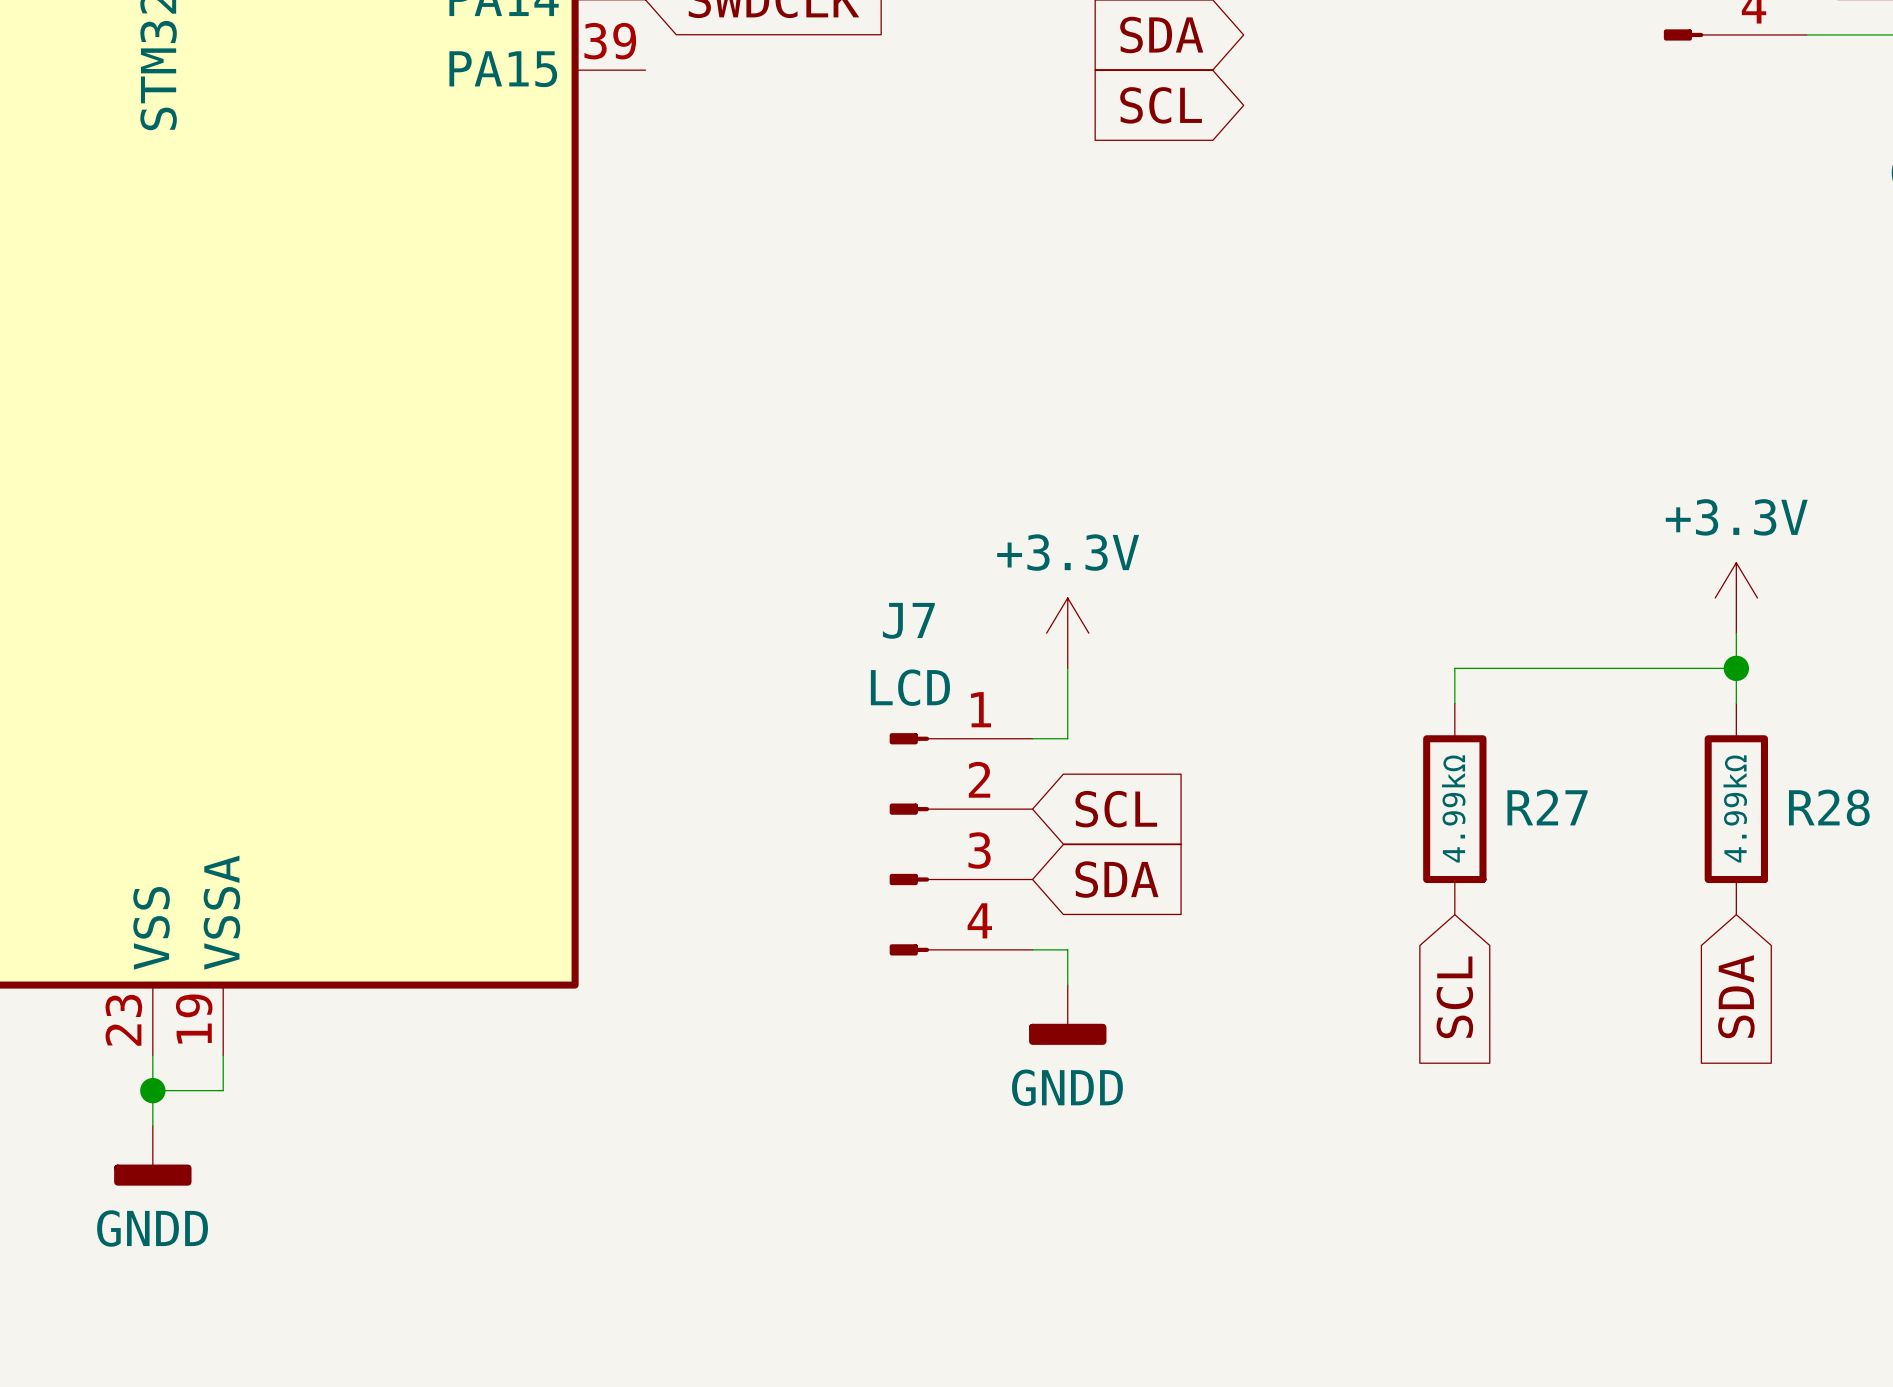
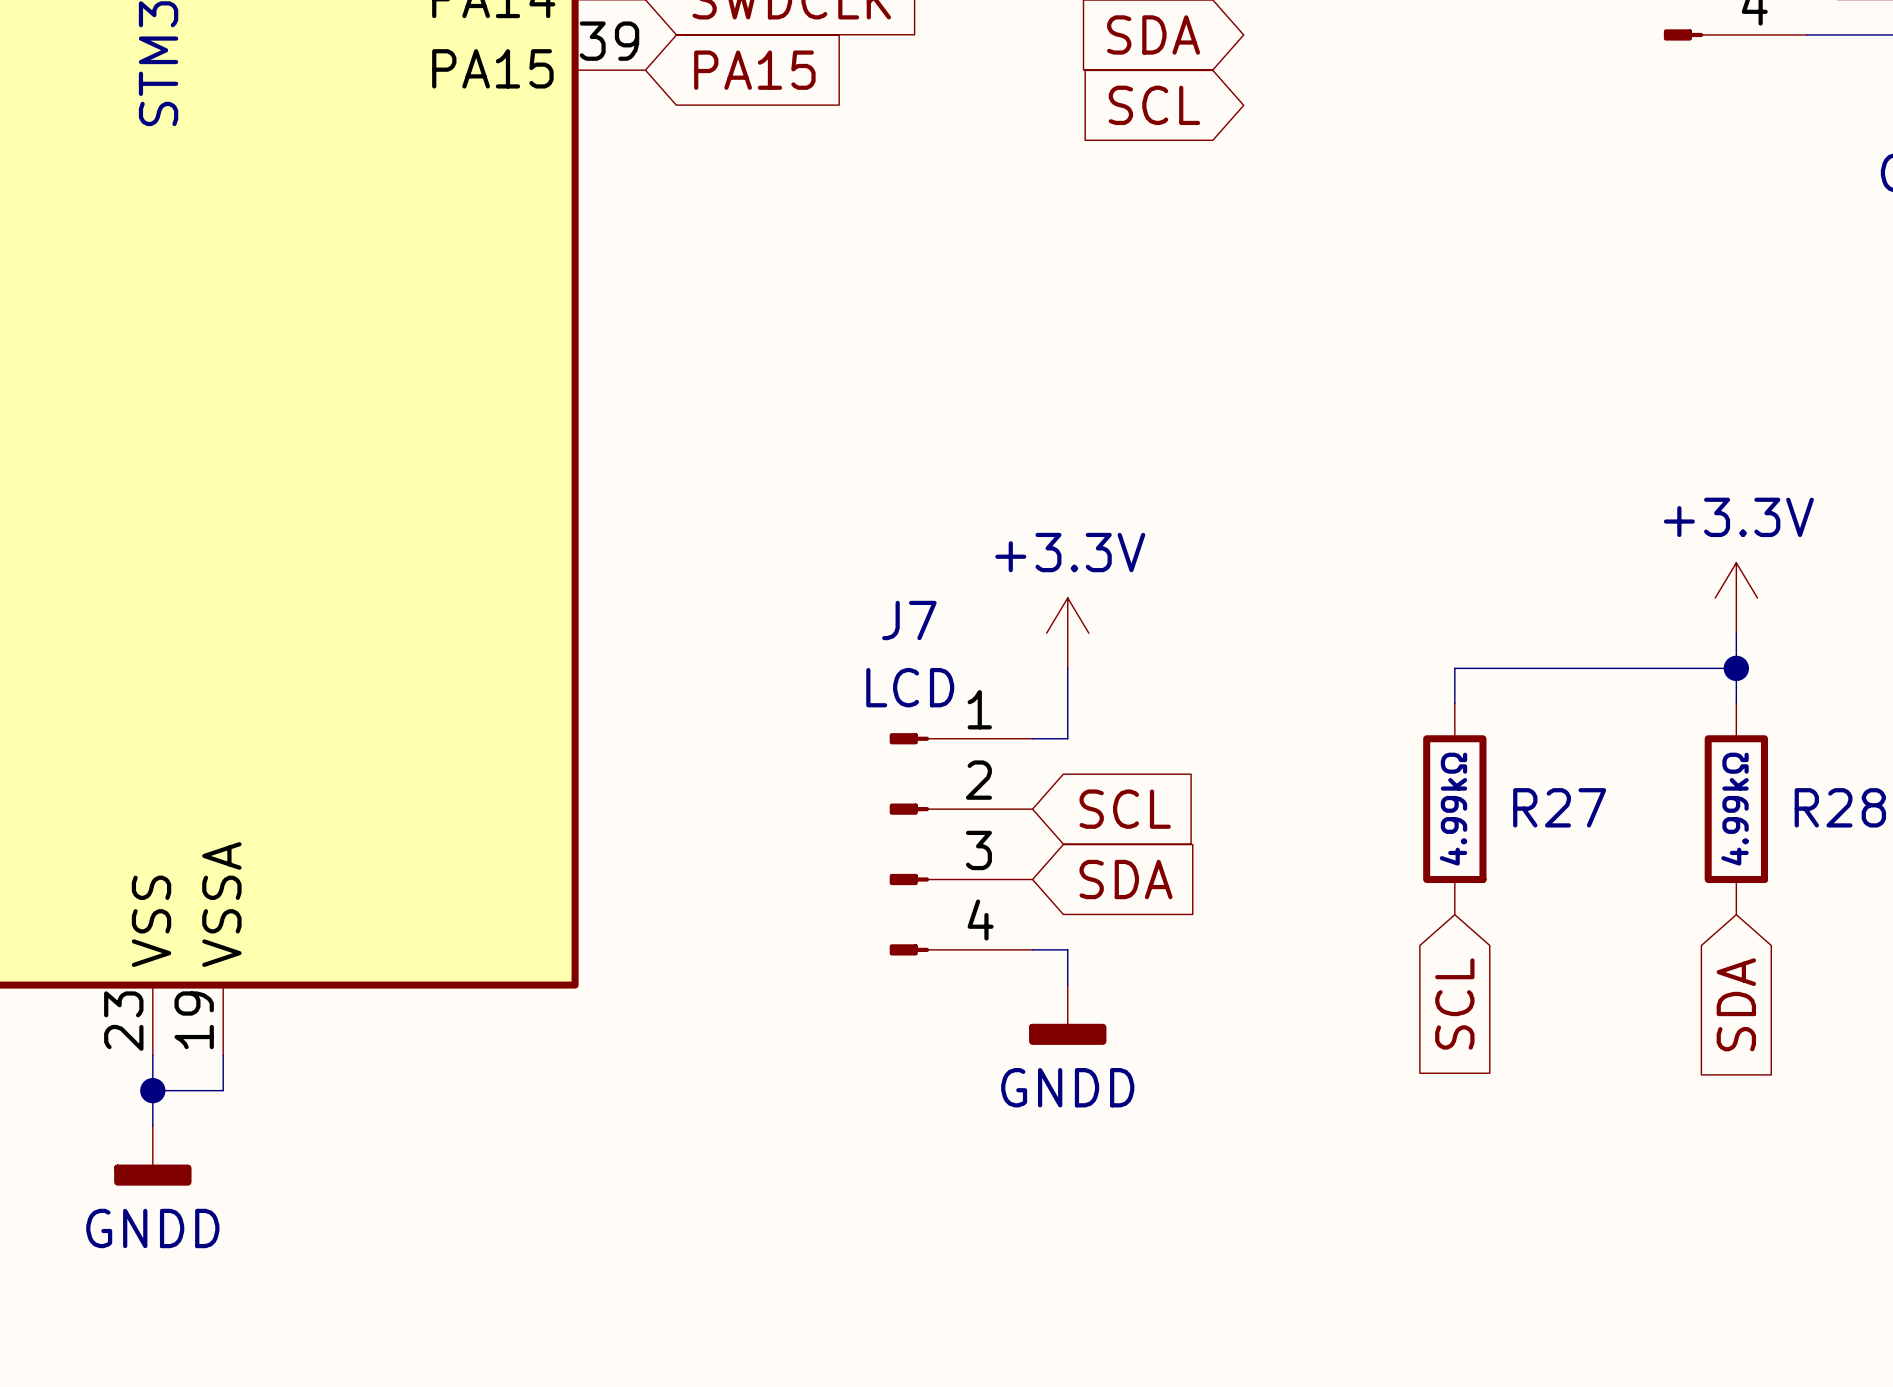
global label: none -> PA15 (754, 70)

